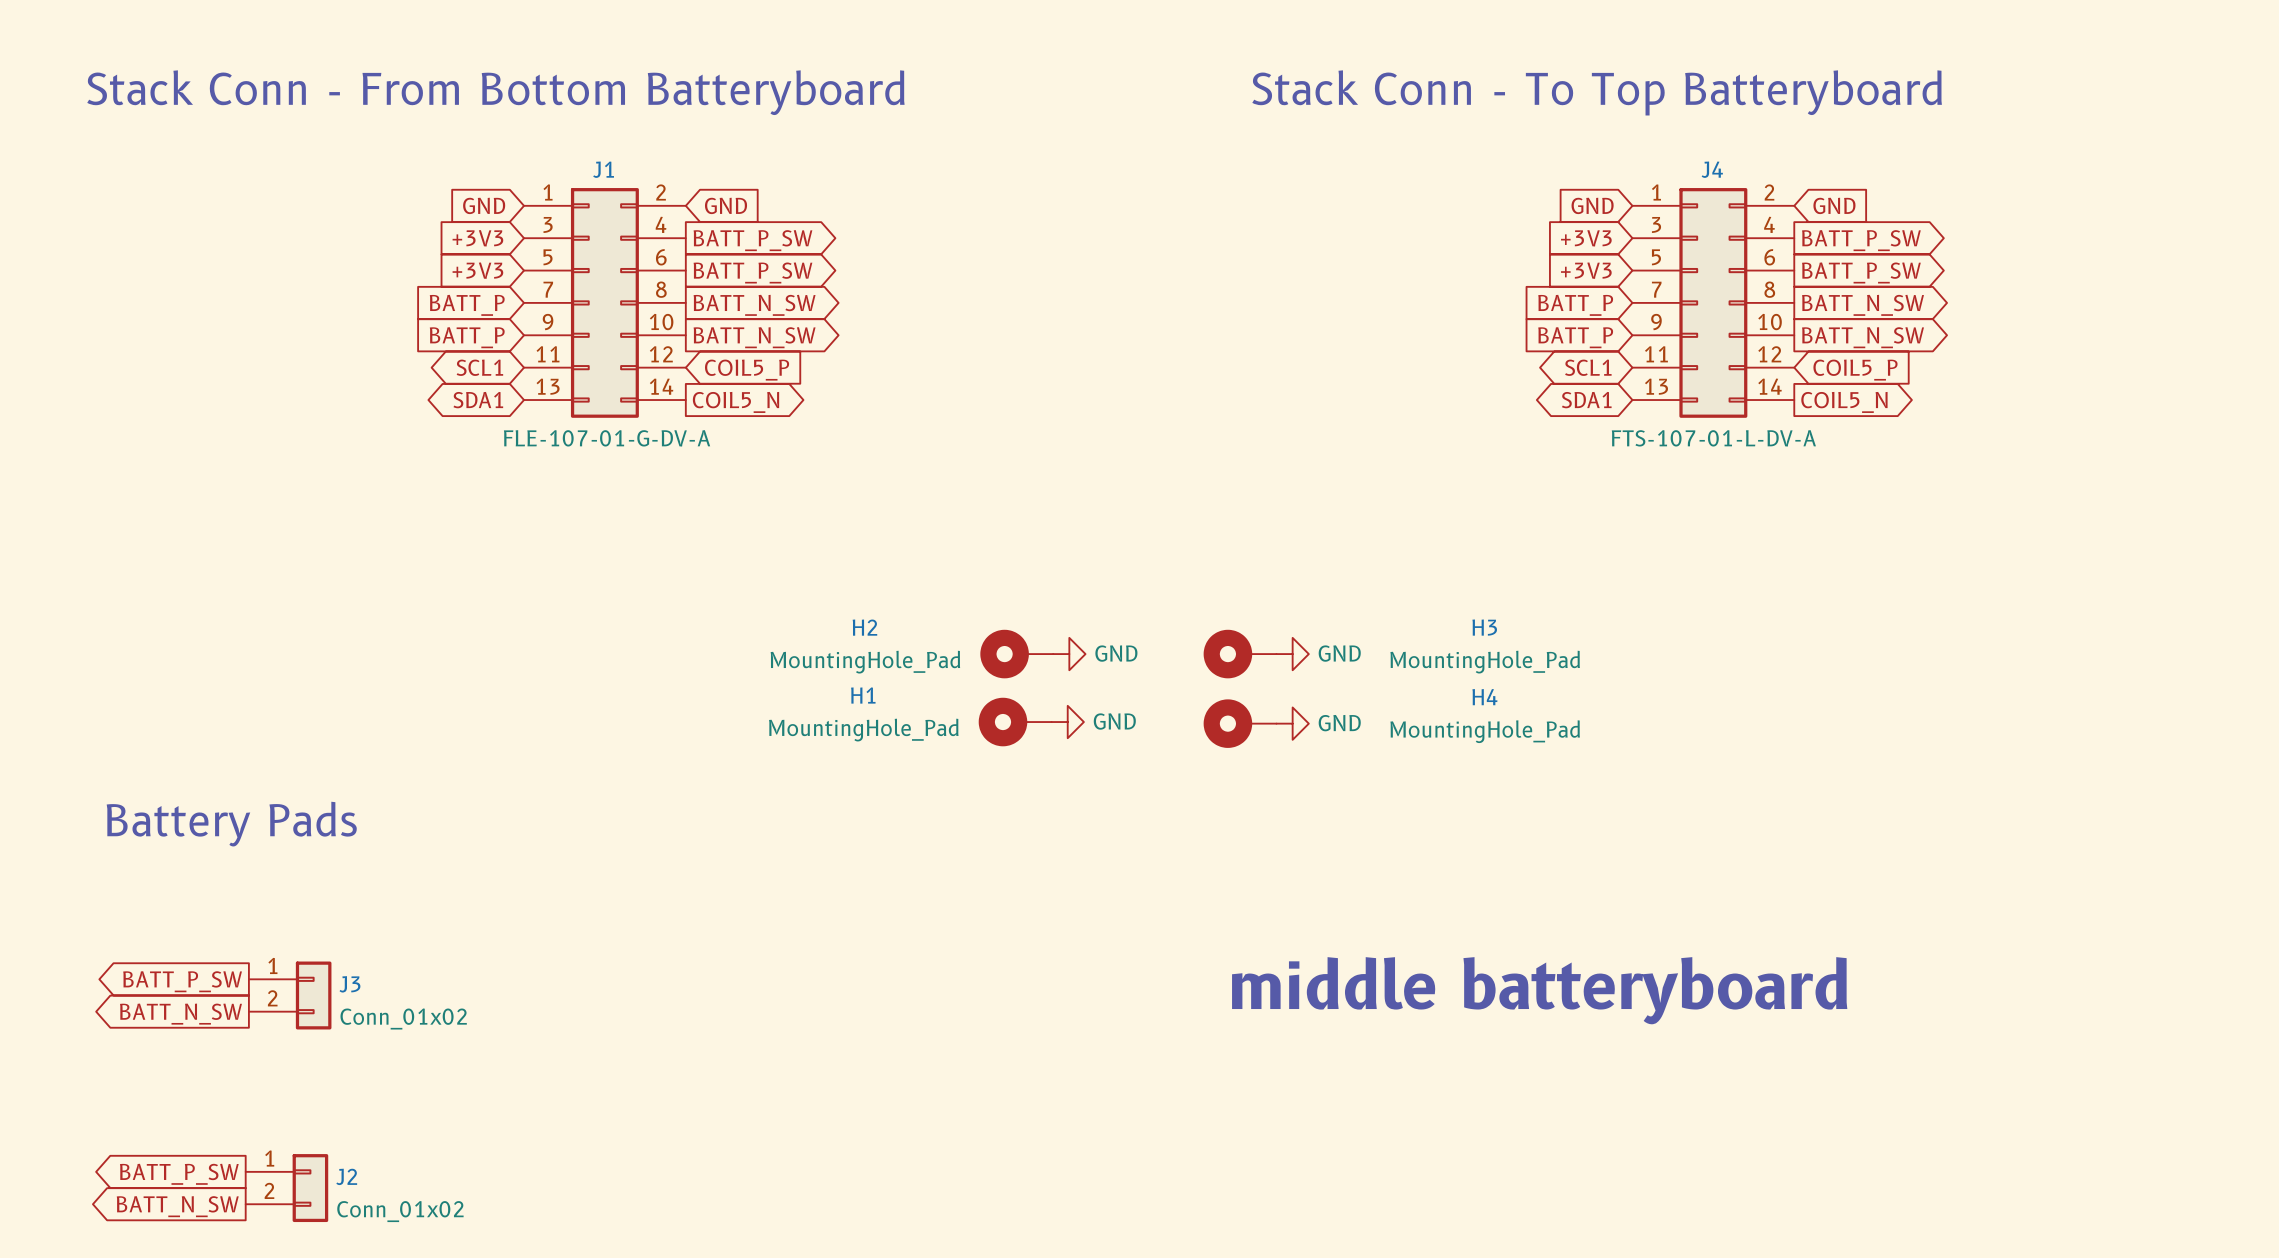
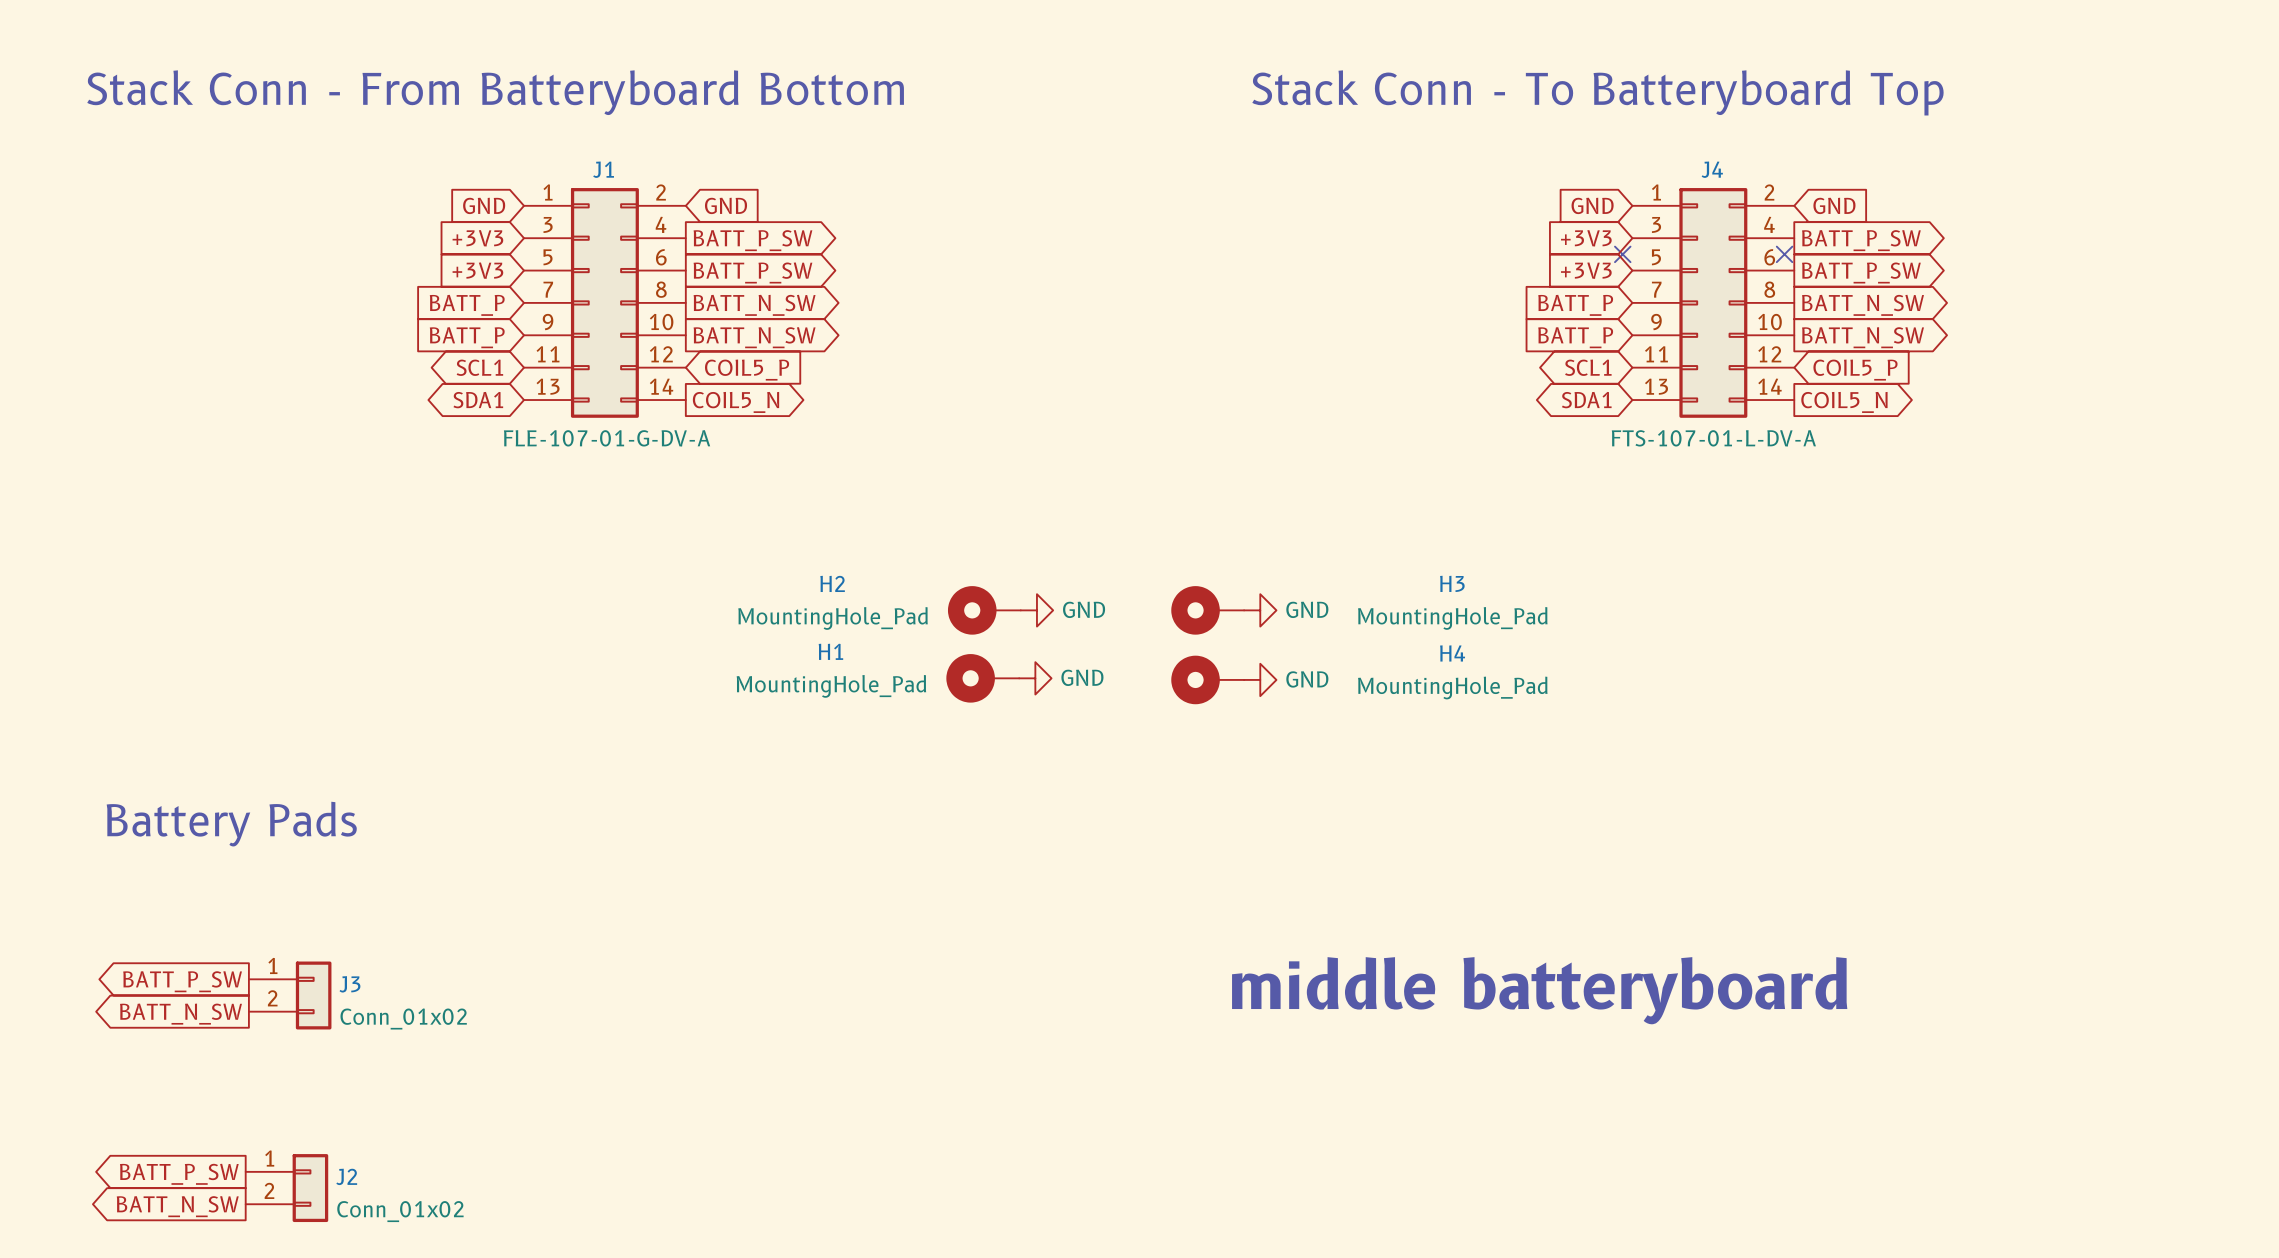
text: Stack Conn - From Bottom Batteryboard (495, 92) -> Stack Conn - From Batteryboard Bottom (495, 92)
text: Stack Conn - To Top Batteryboard (1597, 92) -> Stack Conn - To Batteryboard Top (1597, 92)
no-connect mark: none -> (1622, 254)
no-connect mark: none -> (1784, 254)
power symbol: none -> GND (1036, 610)
power symbol: none -> GND (1260, 610)
H2 position: (1016, 654) -> (984, 610)
power symbol: GND (1069, 654) -> none
H3 position: (1240, 654) -> (1207, 610)
power symbol: GND (1292, 654) -> none
power symbol: none -> GND (1035, 678)
power symbol: none -> GND (1260, 679)
H1 position: (1015, 722) -> (982, 678)
power symbol: GND (1067, 722) -> none
H4 position: (1240, 723) -> (1207, 679)
power symbol: GND (1292, 723) -> none

